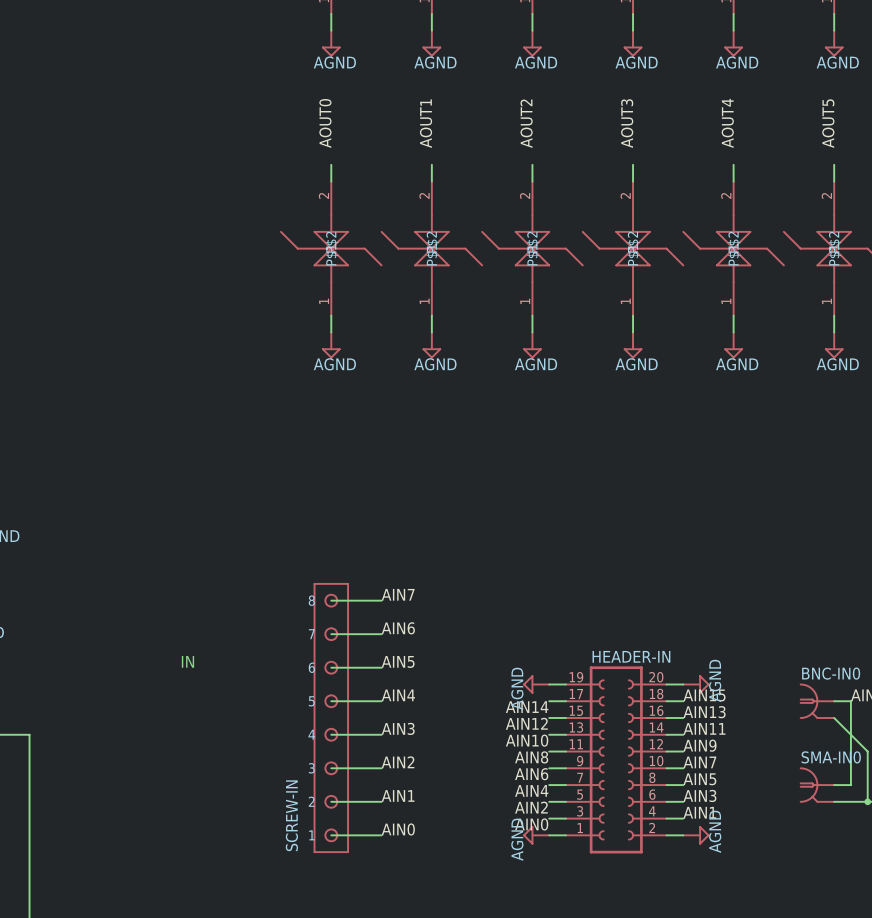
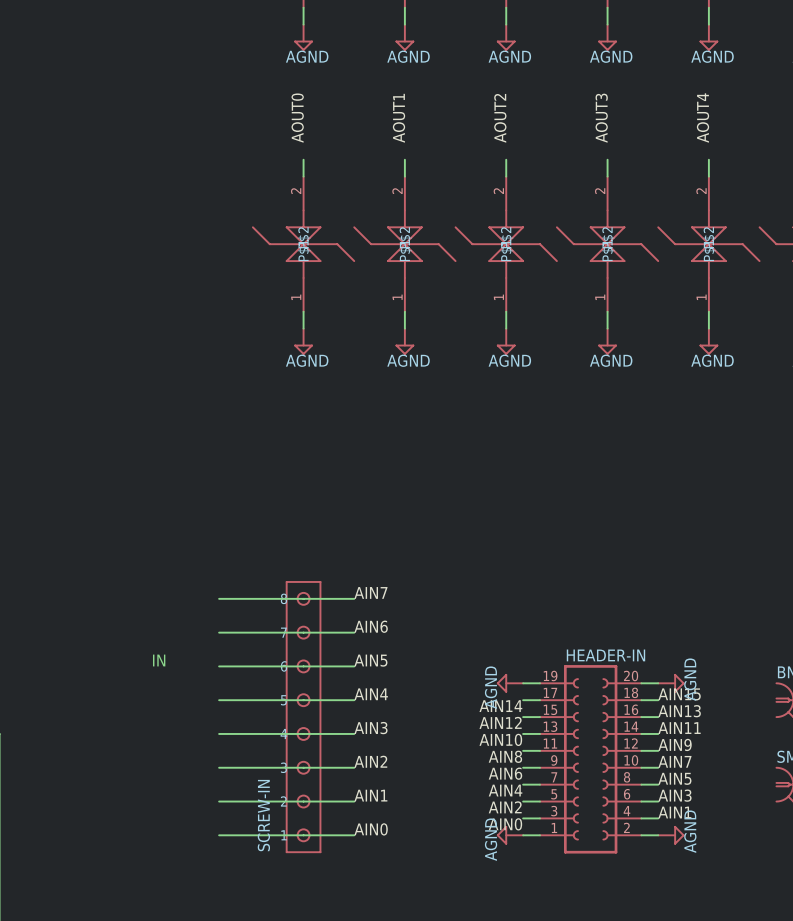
wire: none -> (219, 598) (303, 598)
wire: none -> (219, 632) (303, 632)
wire: none -> (219, 666) (303, 666)
wire: none -> (219, 700) (303, 700)
wire: none -> (219, 733) (303, 733)
wire: none -> (219, 767) (303, 767)
wire: none -> (219, 801) (303, 801)
wire: none -> (219, 835) (303, 835)

